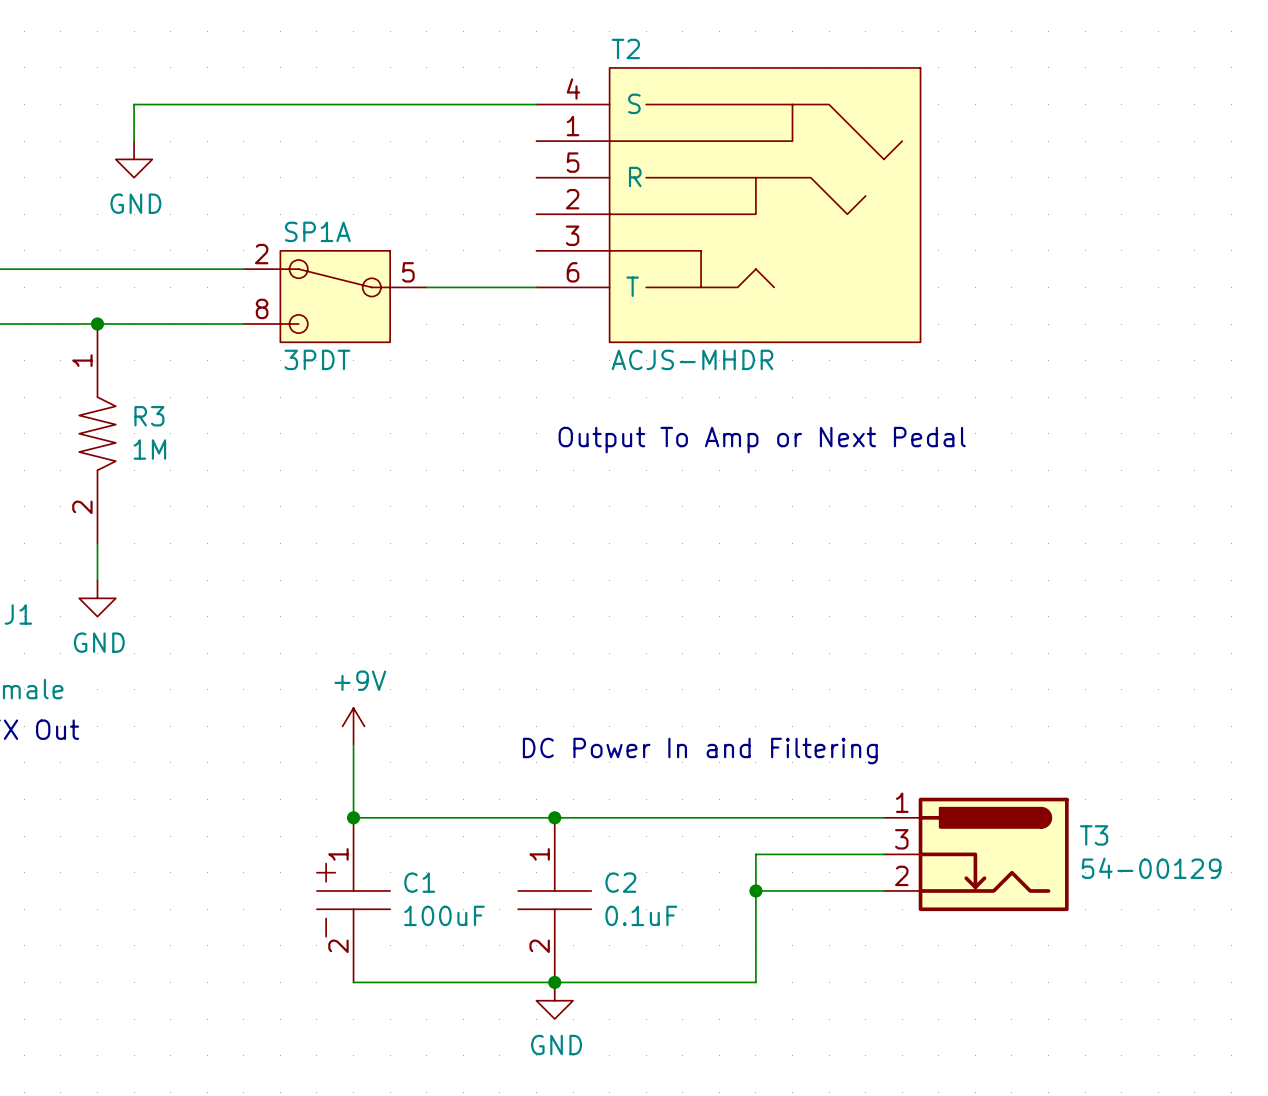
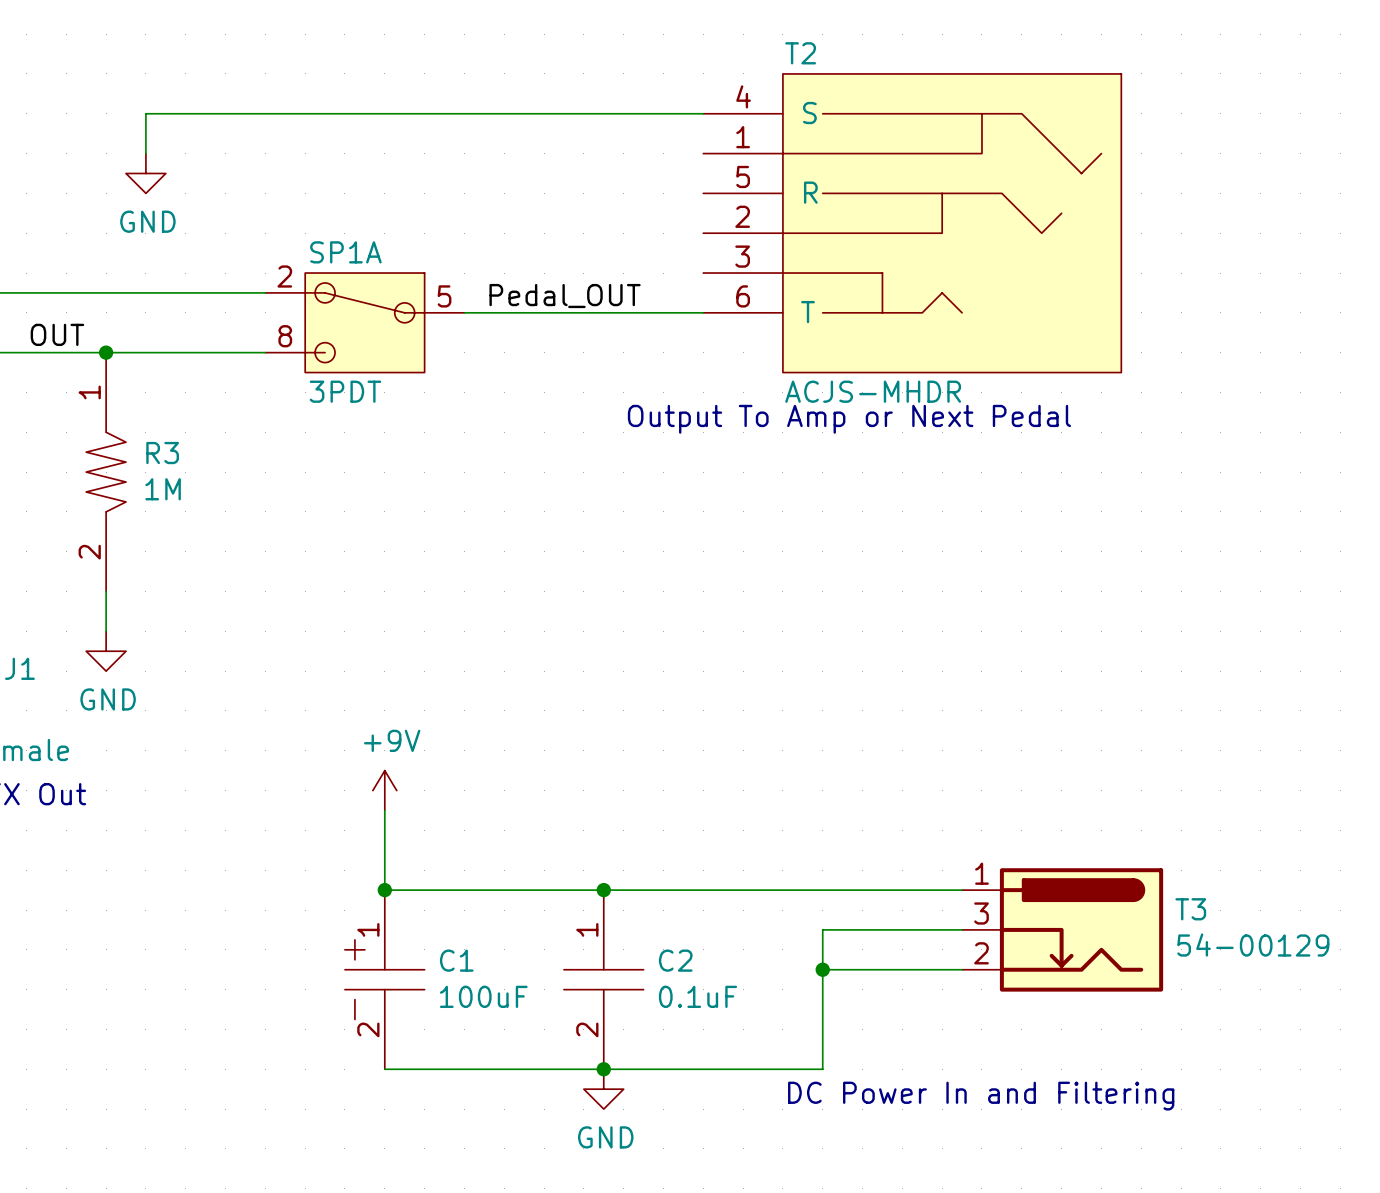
T2 position: (728, 205) -> (912, 223)
label: none -> Pedal_OUT (565, 296)
label: none -> OUT (57, 334)
text position: Output To Amp or Next Pedal (762, 440) -> Output To Amp or Next Pedal (849, 419)
text position: DC Power In and Filtering (700, 751) -> DC Power In and Filtering (981, 1096)

